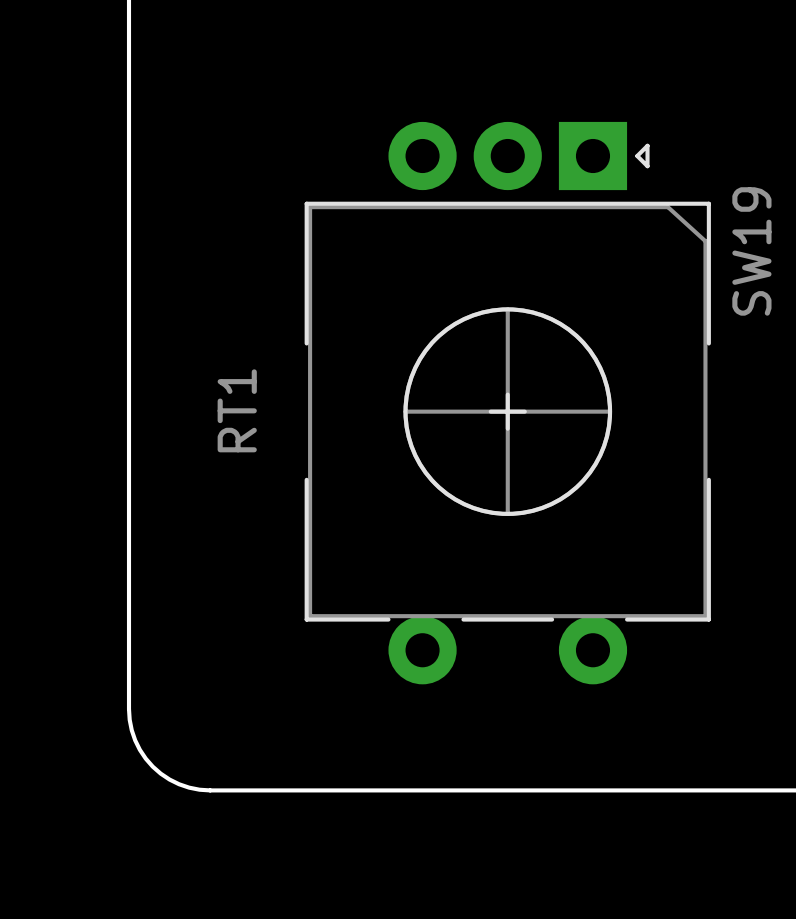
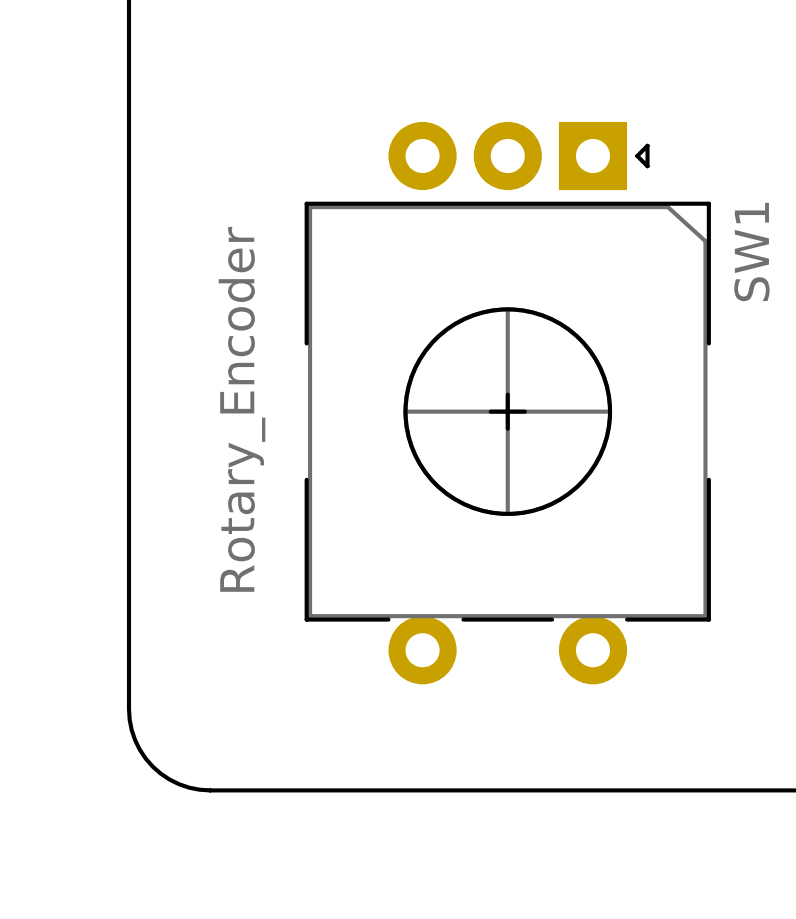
SW19 name: SW19 (751, 251) -> SW1 (751, 252)
SW19 value: RT1 (237, 410) -> Rotary_Encoder (242, 409)

